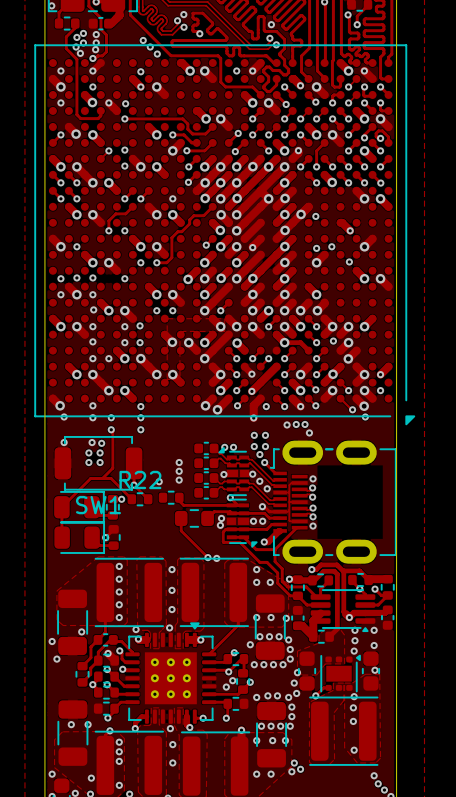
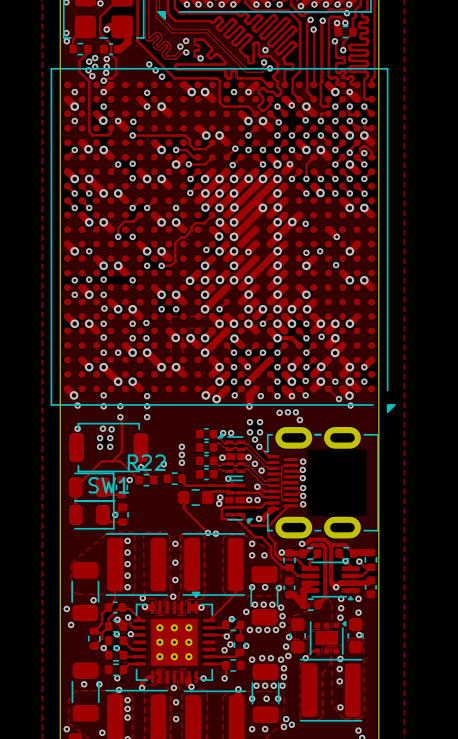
via: none -> (66, 41)

